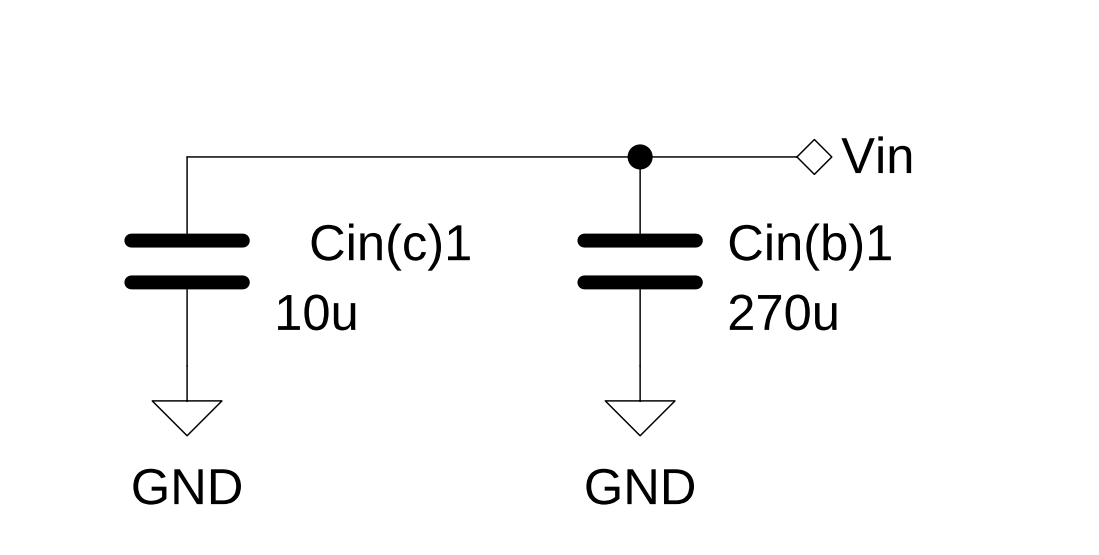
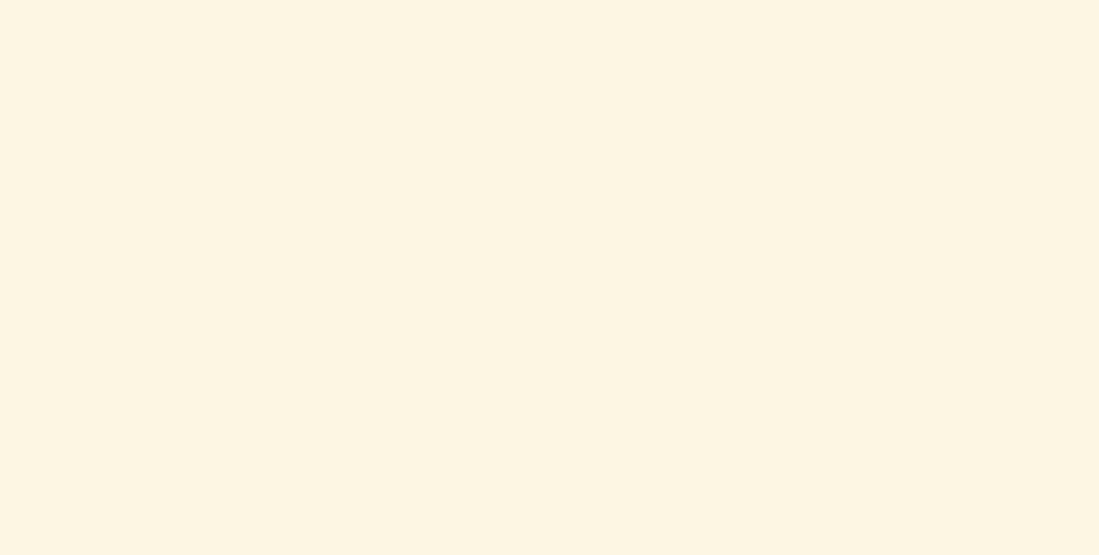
hierarchical label: Vin (876, 154) -> none
wire: (187, 156) (796, 156) -> none
junction: (640, 156) -> none
Cin(c)1: 10u (187, 261) -> none
Cin(b)1: 270u (640, 261) -> none
power symbol: GND (187, 400) -> none
power symbol: GND (640, 400) -> none

